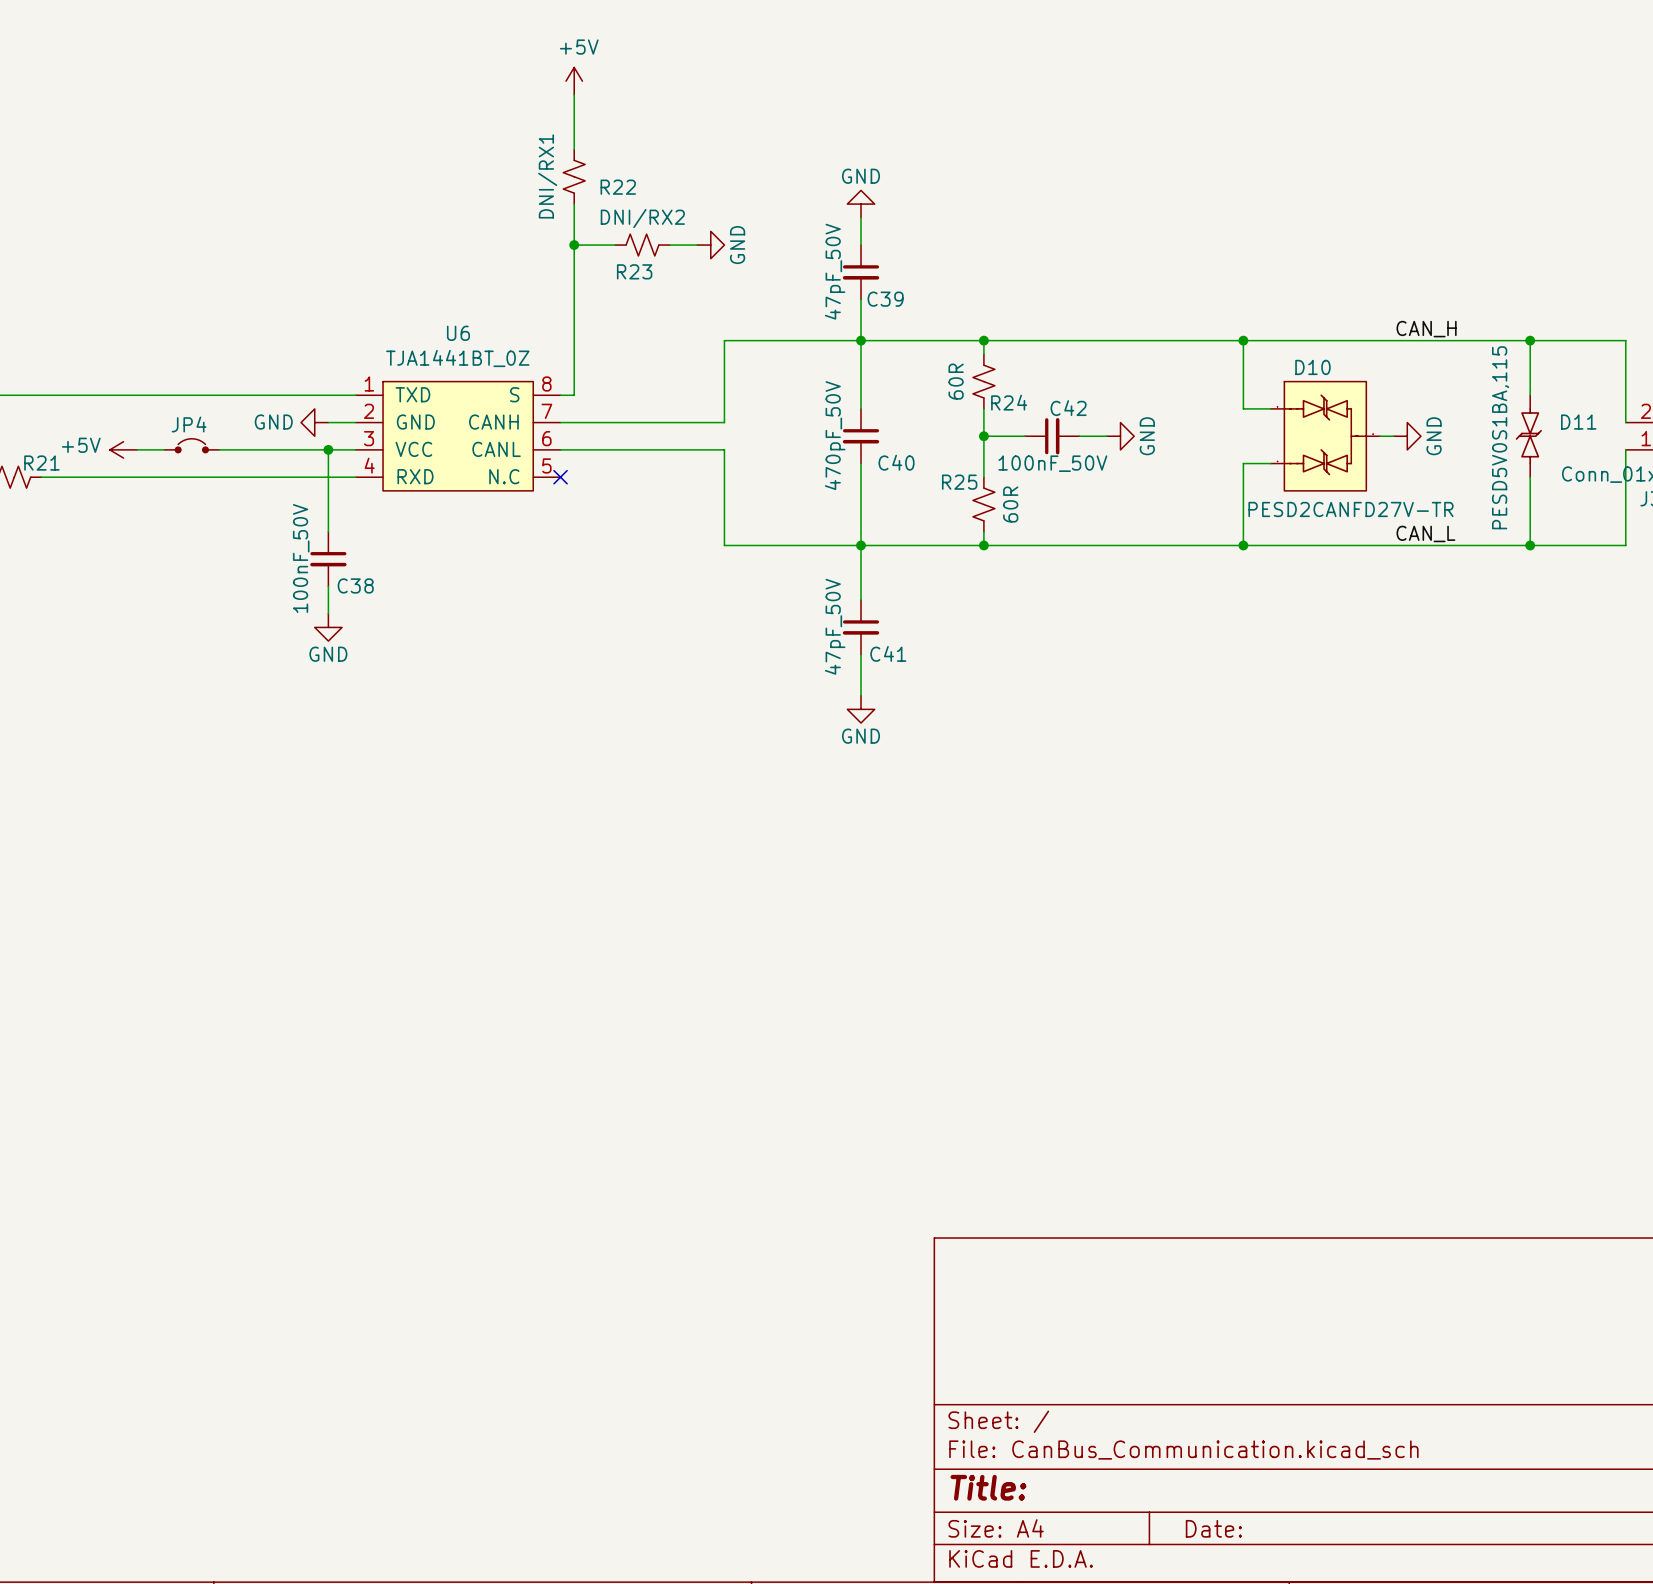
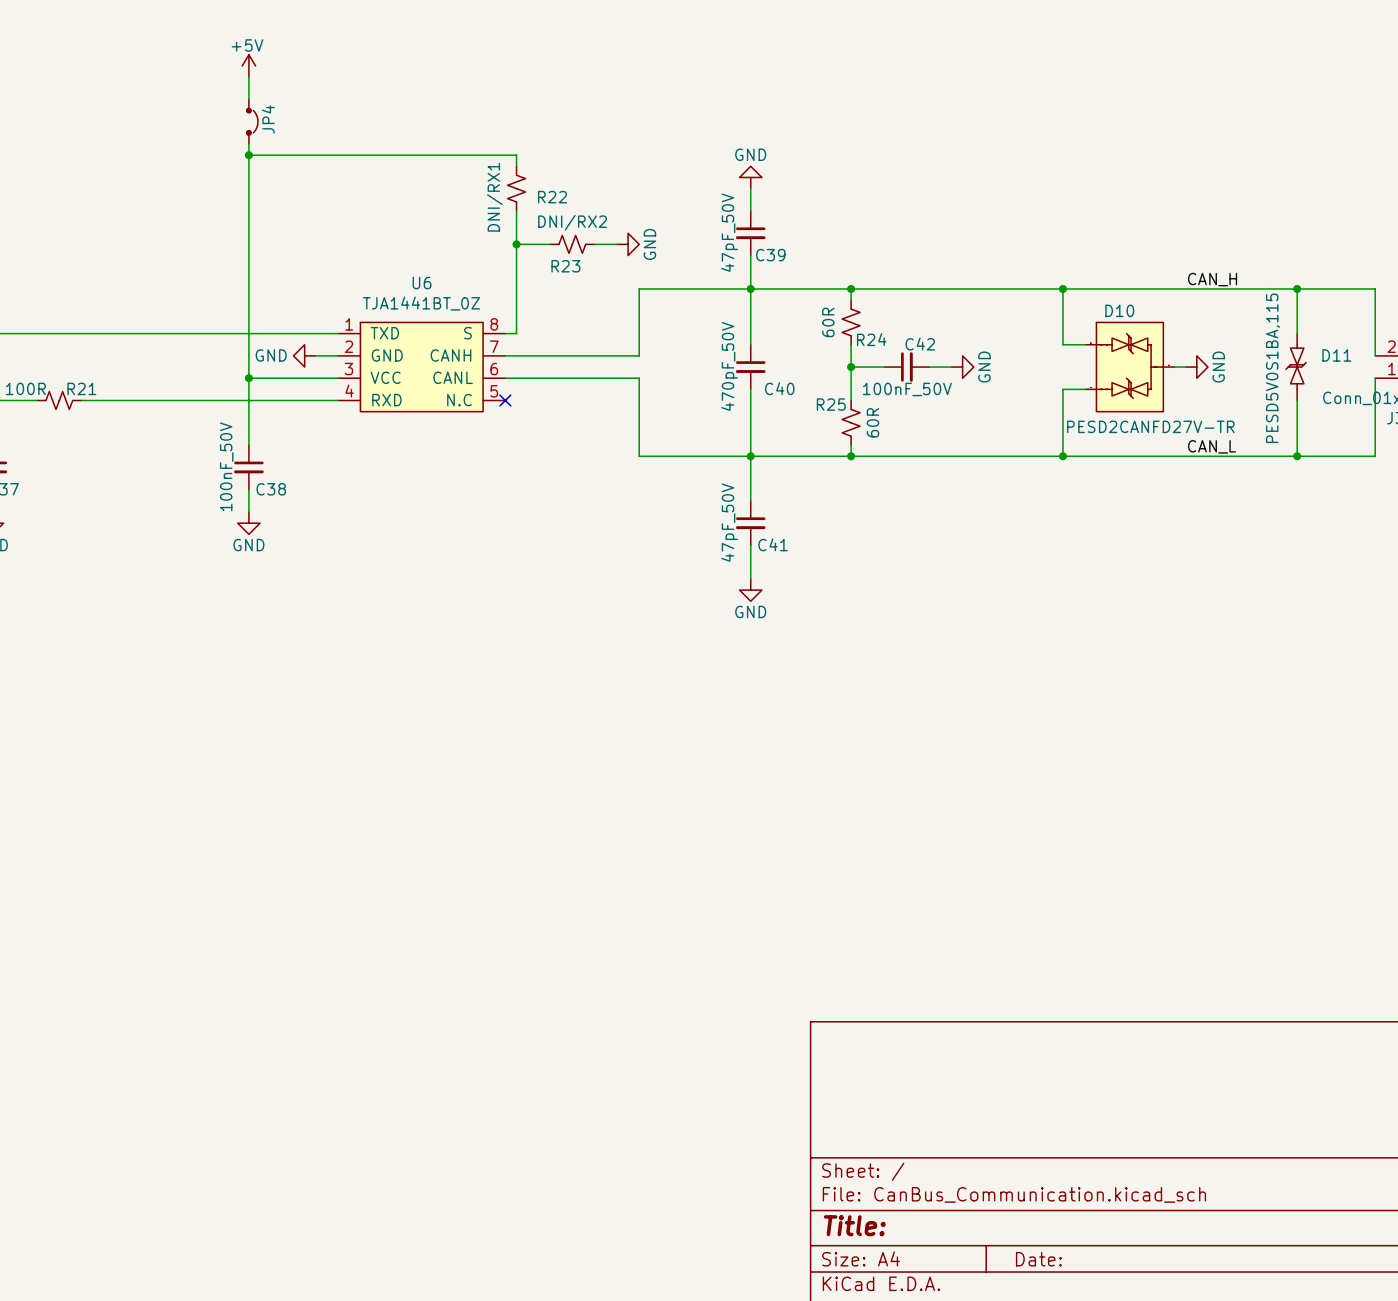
power symbol: none -> +5V (248, 65)
wire: none -> (248, 77) (248, 99)
power symbol: +5V (574, 81) -> none
wire: (574, 94) (574, 149) -> none
wire: none -> (248, 144) (248, 445)
wire: none -> (248, 155) (516, 155) (516, 166)
junction: none -> (248, 155)
R22 value position: DNI/RX1 (547, 176) -> DNI/RX1 (494, 197)
R22 position: (574, 176) -> (516, 188)
wire: (574, 204) (574, 245) (615, 245) -> none
junction position: (574, 245) -> (516, 244)
R23 position: (642, 245) -> (572, 244)
wire: (669, 245) (697, 245) -> (594, 244) (616, 244)
power symbol position: GND (710, 245) -> GND (628, 244)
wire: none -> (516, 244) (550, 244)
JP4 rotation: 0° (191, 445) -> 90° clockwise (252, 121)
JP4 position: (191, 445) -> (252, 121)
power symbol: +5V (123, 449) -> none
wire: (137, 449) (164, 449) -> none
wire: (219, 449) (246, 449) -> none
junction: none -> (248, 378)
wire: (328, 449) (328, 531) -> none
junction: (328, 449) -> none
C38 position: (328, 559) -> (248, 467)
wire: (328, 586) (328, 613) -> (248, 489) (248, 512)
power symbol position: GND (328, 627) -> GND (248, 523)

